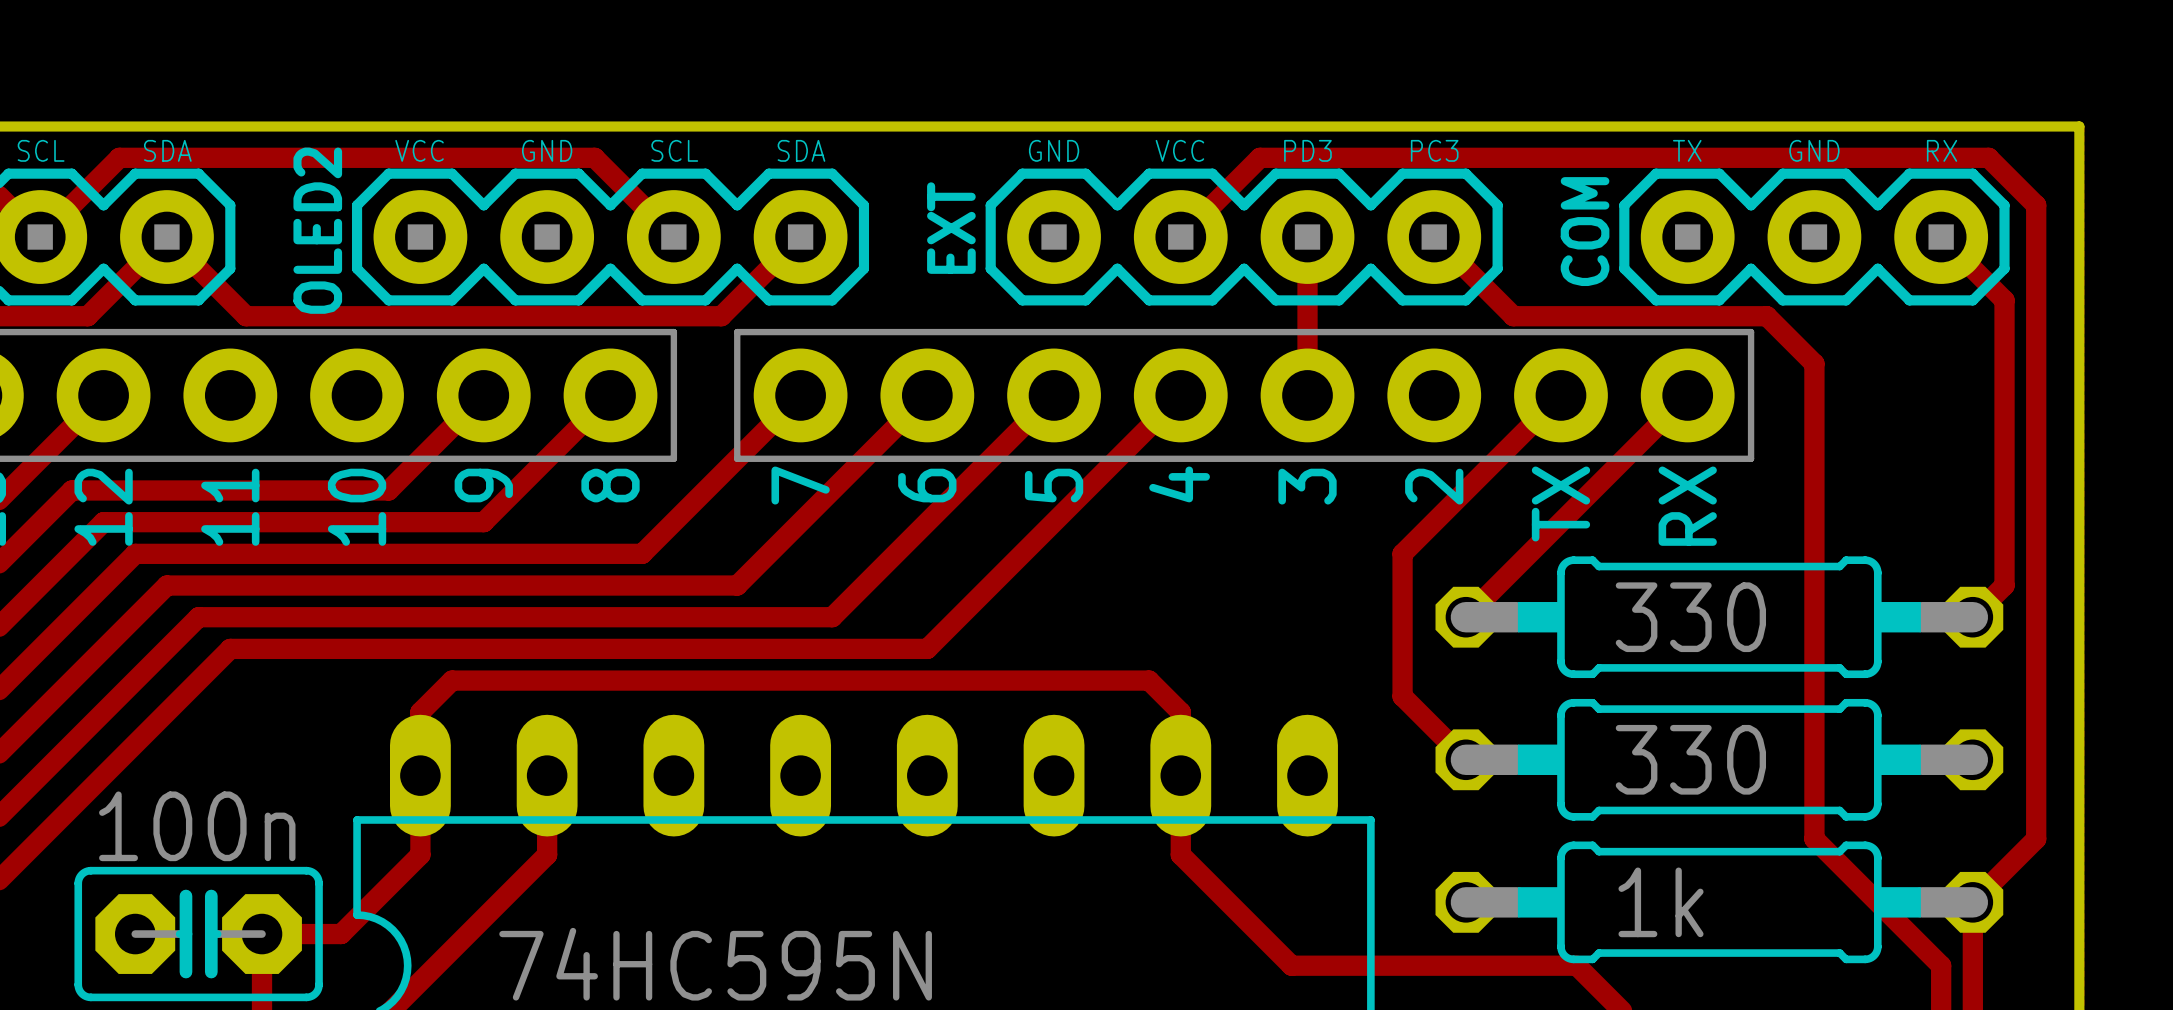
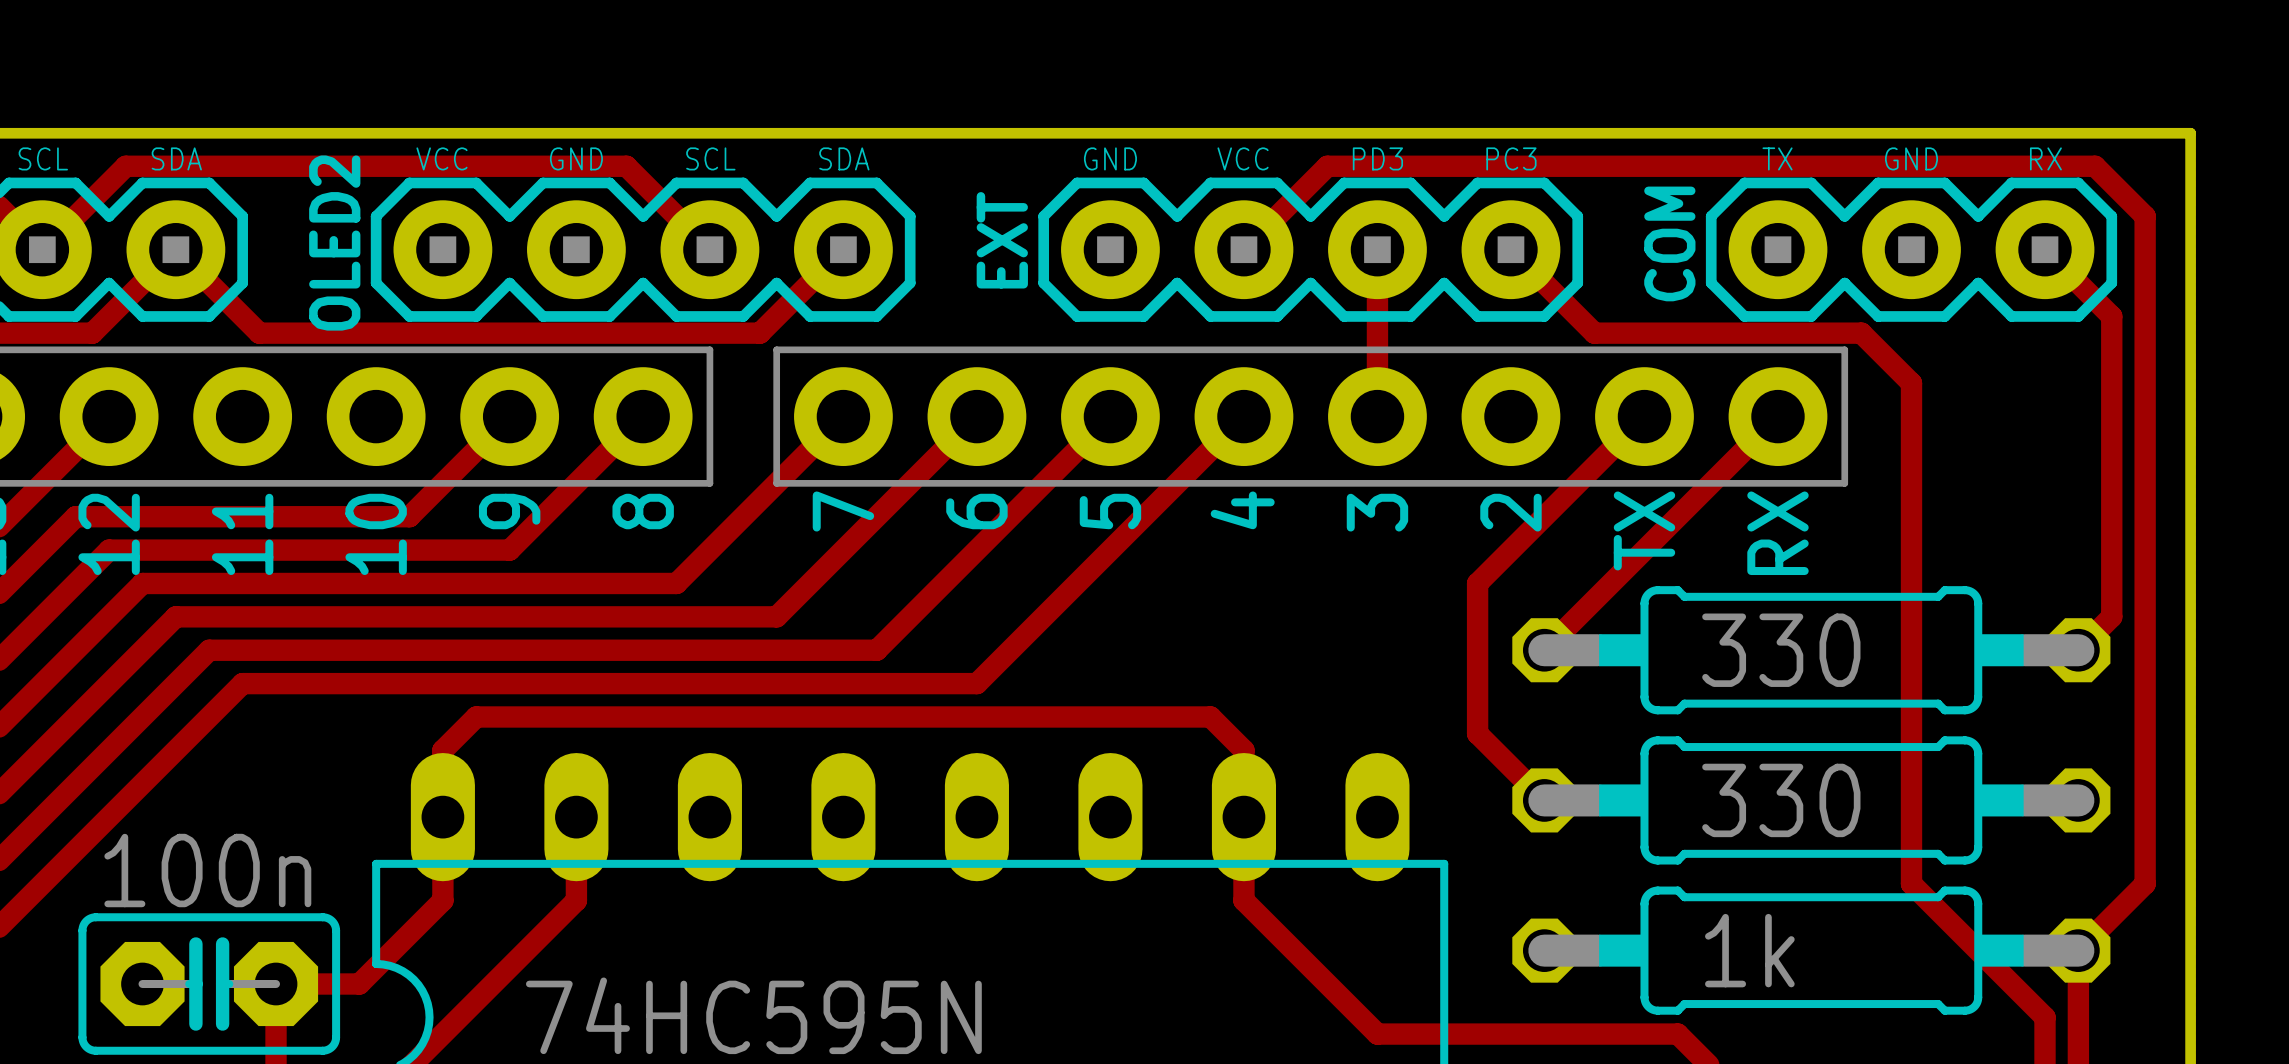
track: (1291, 965) (1576, 965) (1592, 981) -> (1360, 1017) (1377, 1034) (1677, 1034)

